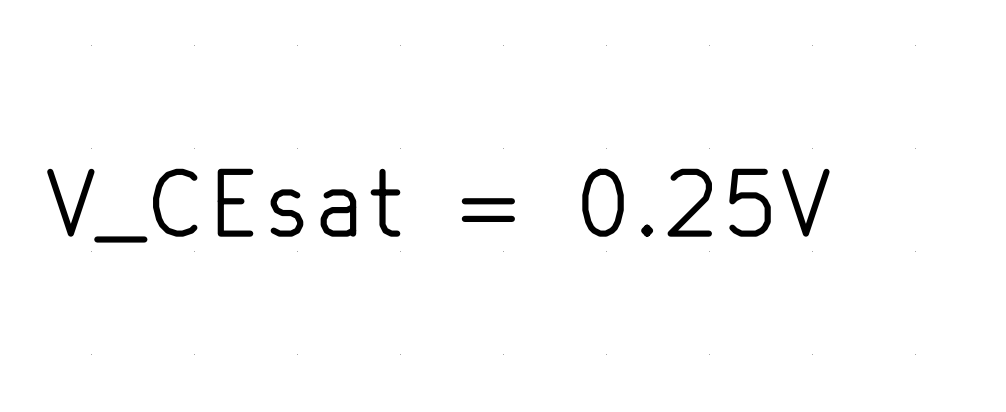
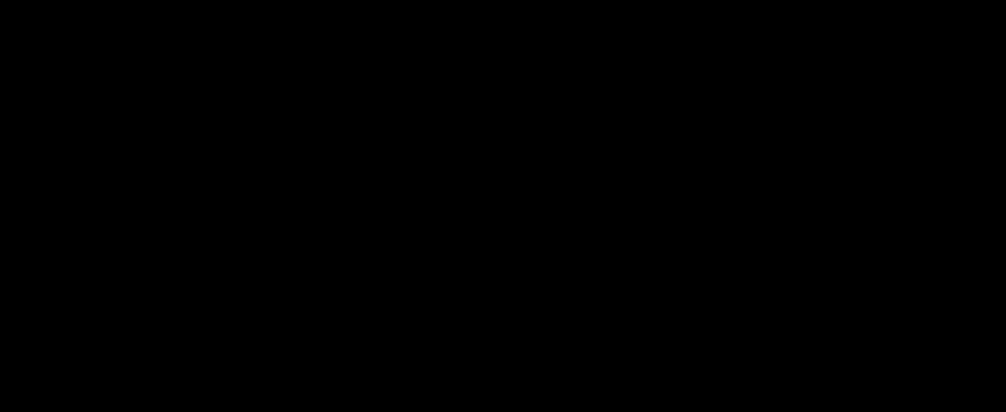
text: V_CEsat = 0.25V (438, 205) -> none

